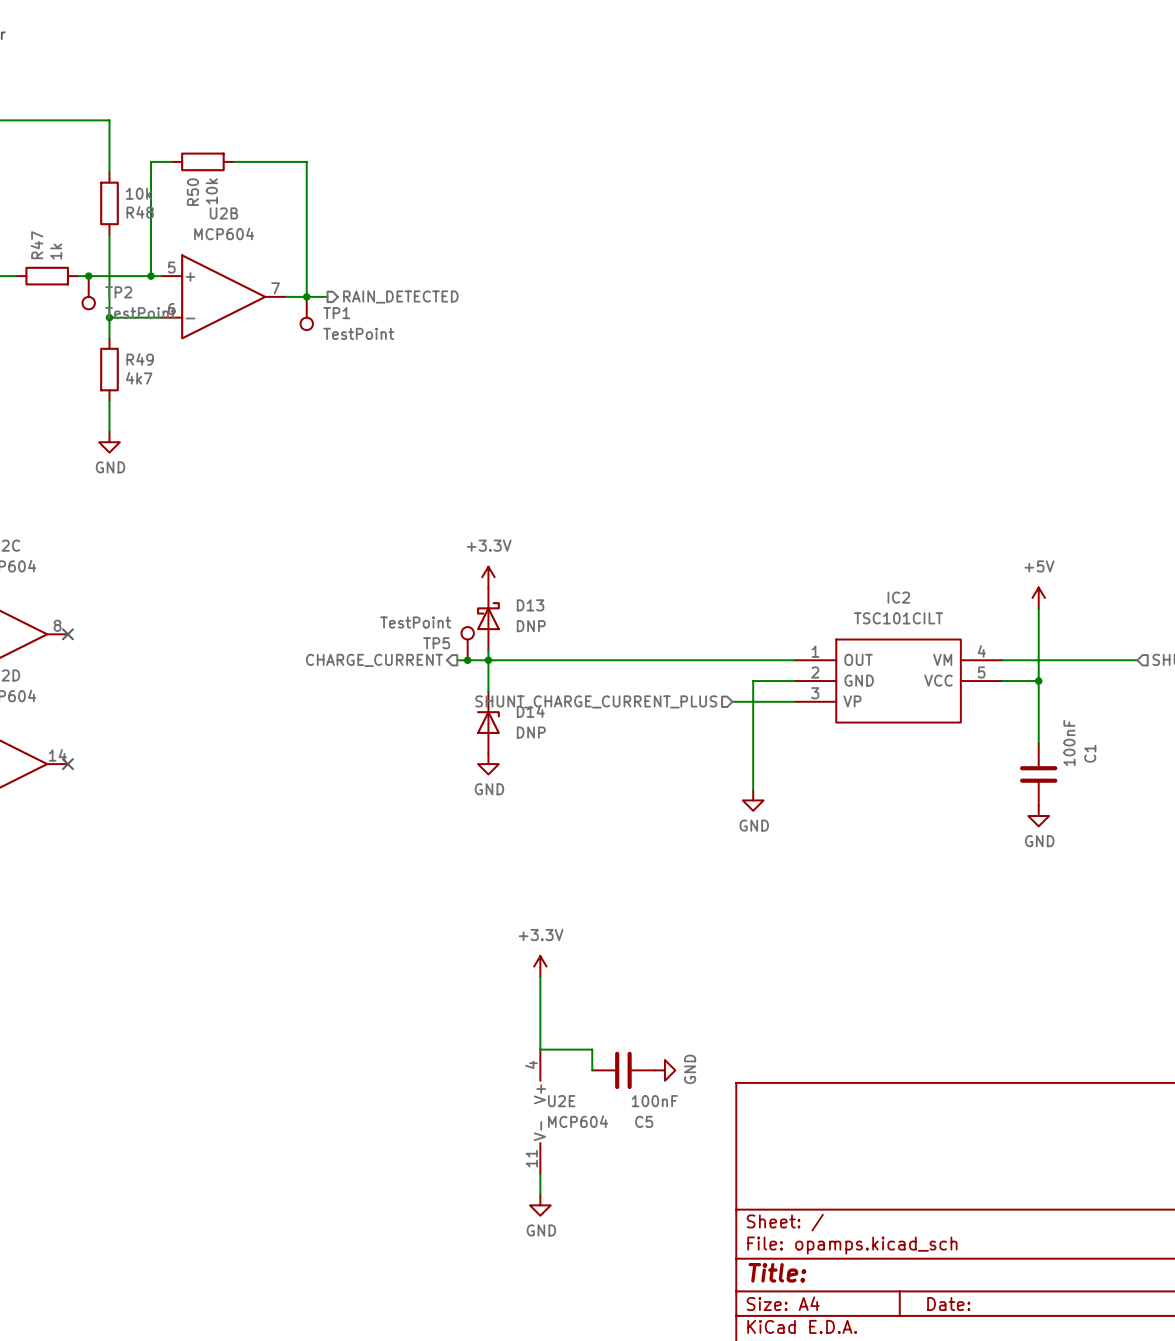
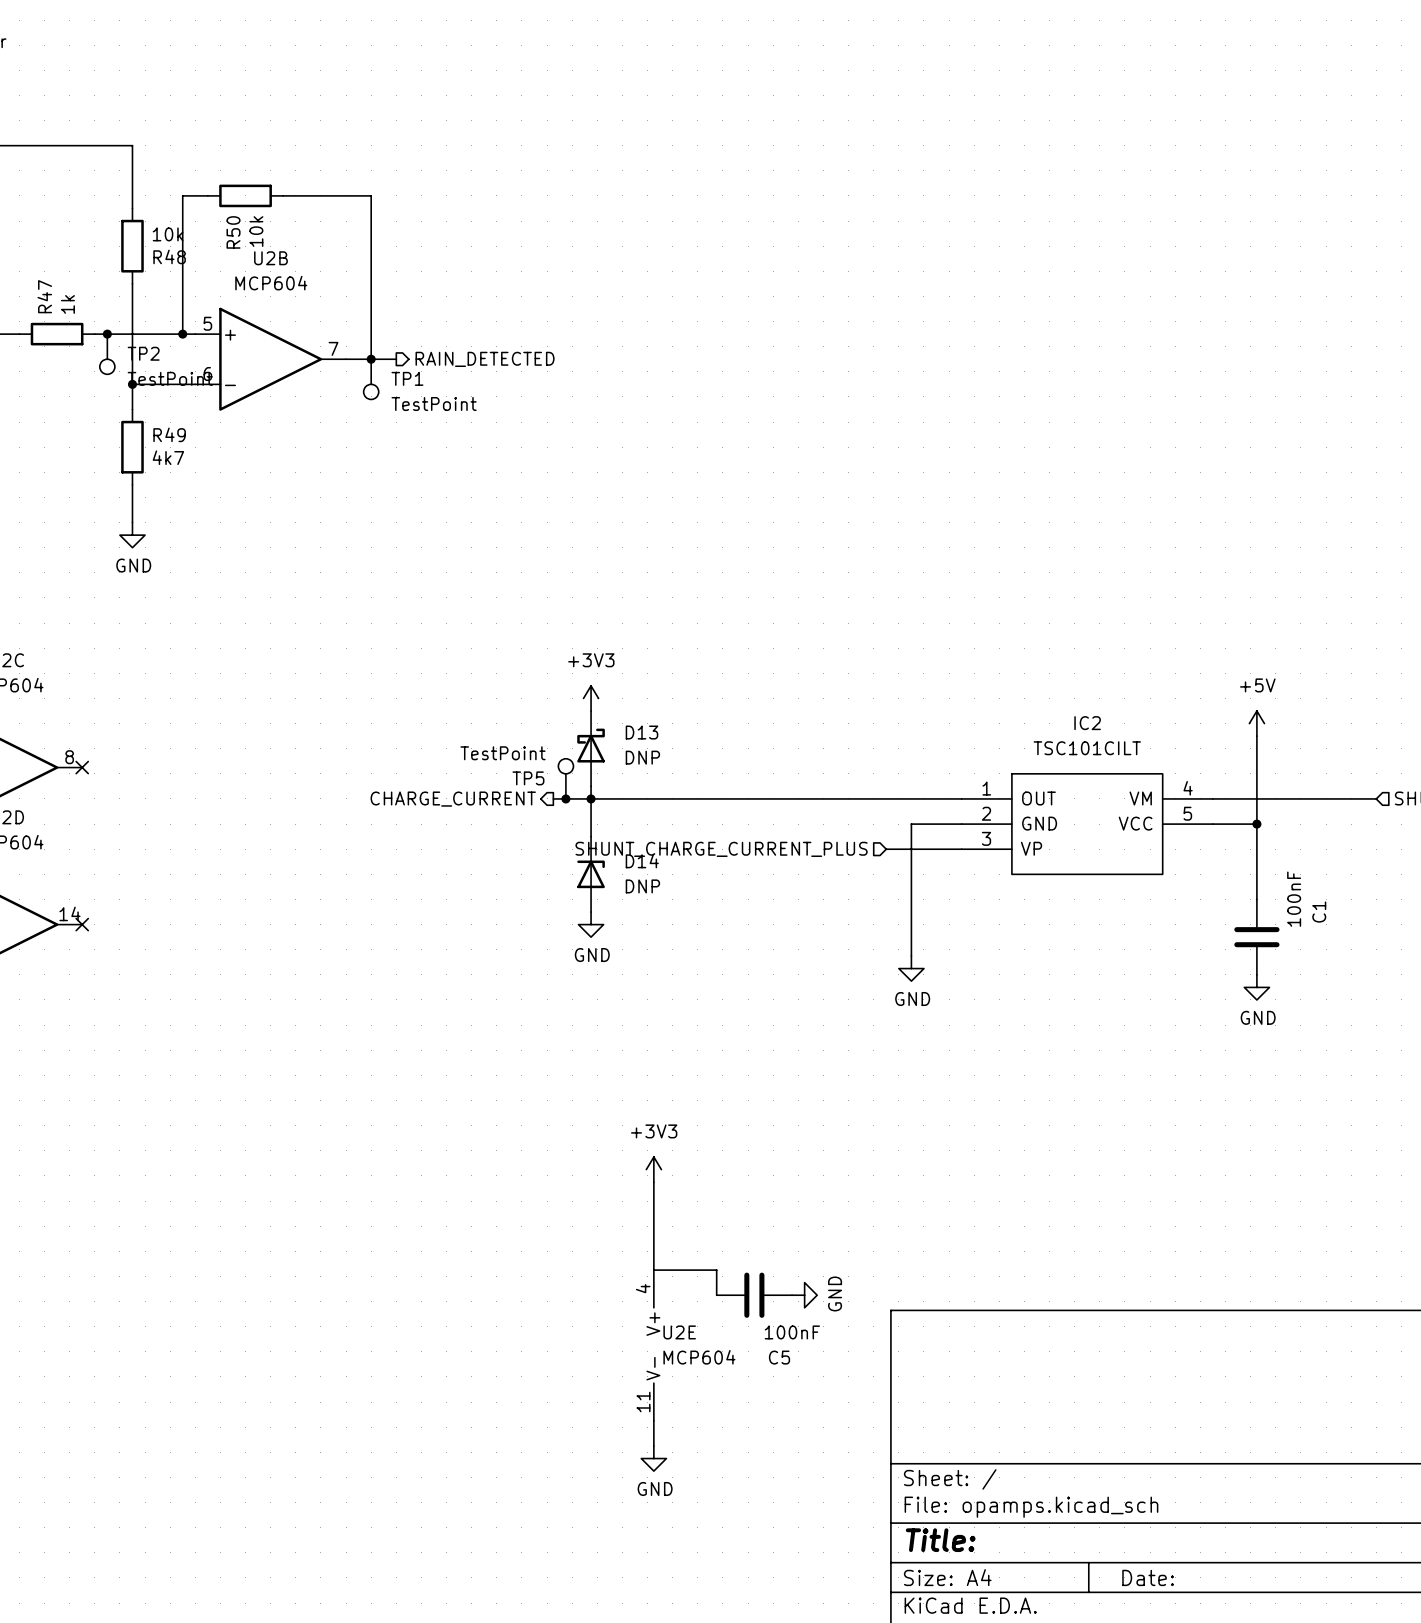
power symbol: +3.3V (488, 577) -> +3V3 (591, 698)
power symbol: +3.3V (540, 966) -> +3V3 (653, 1169)

